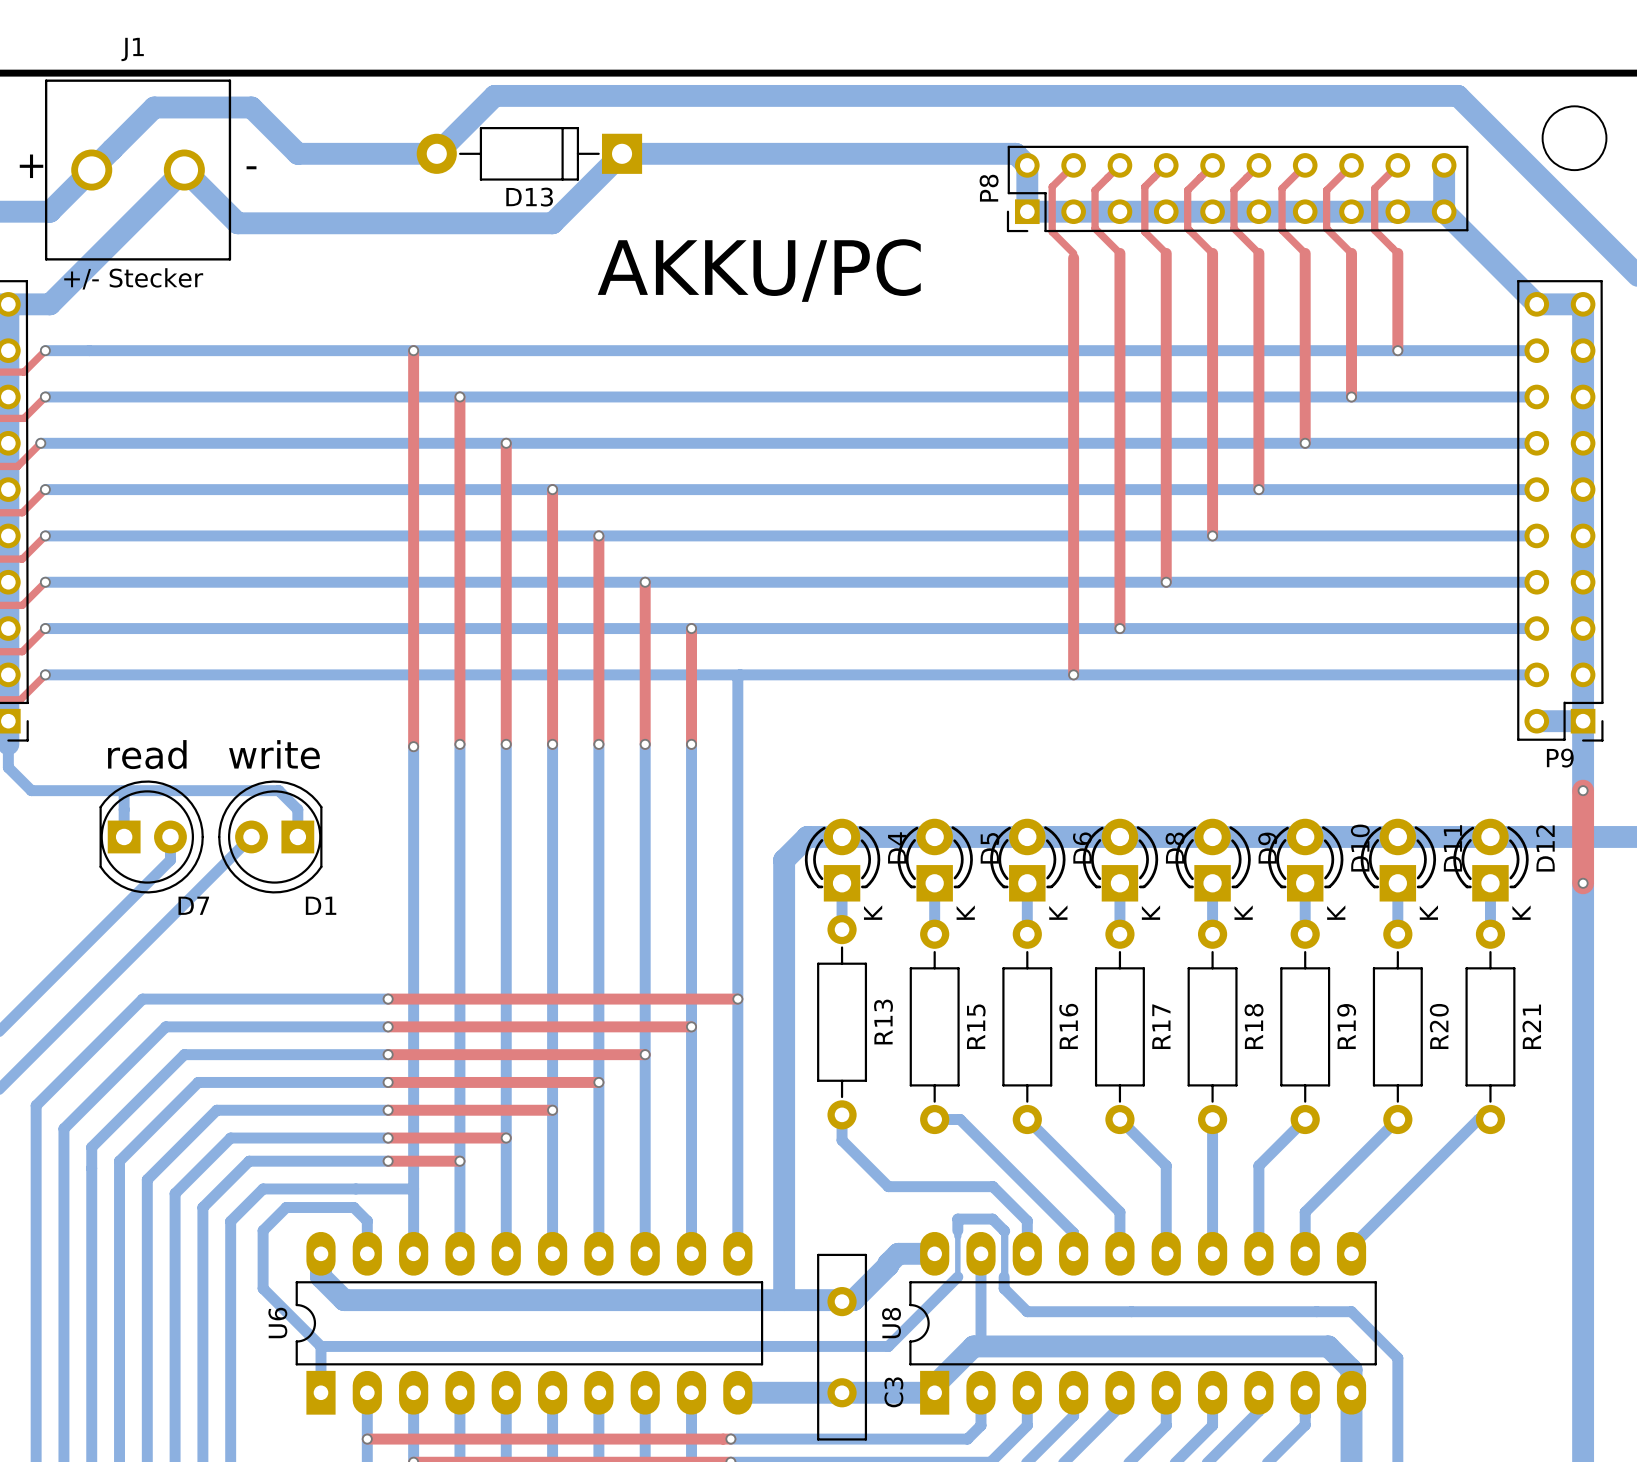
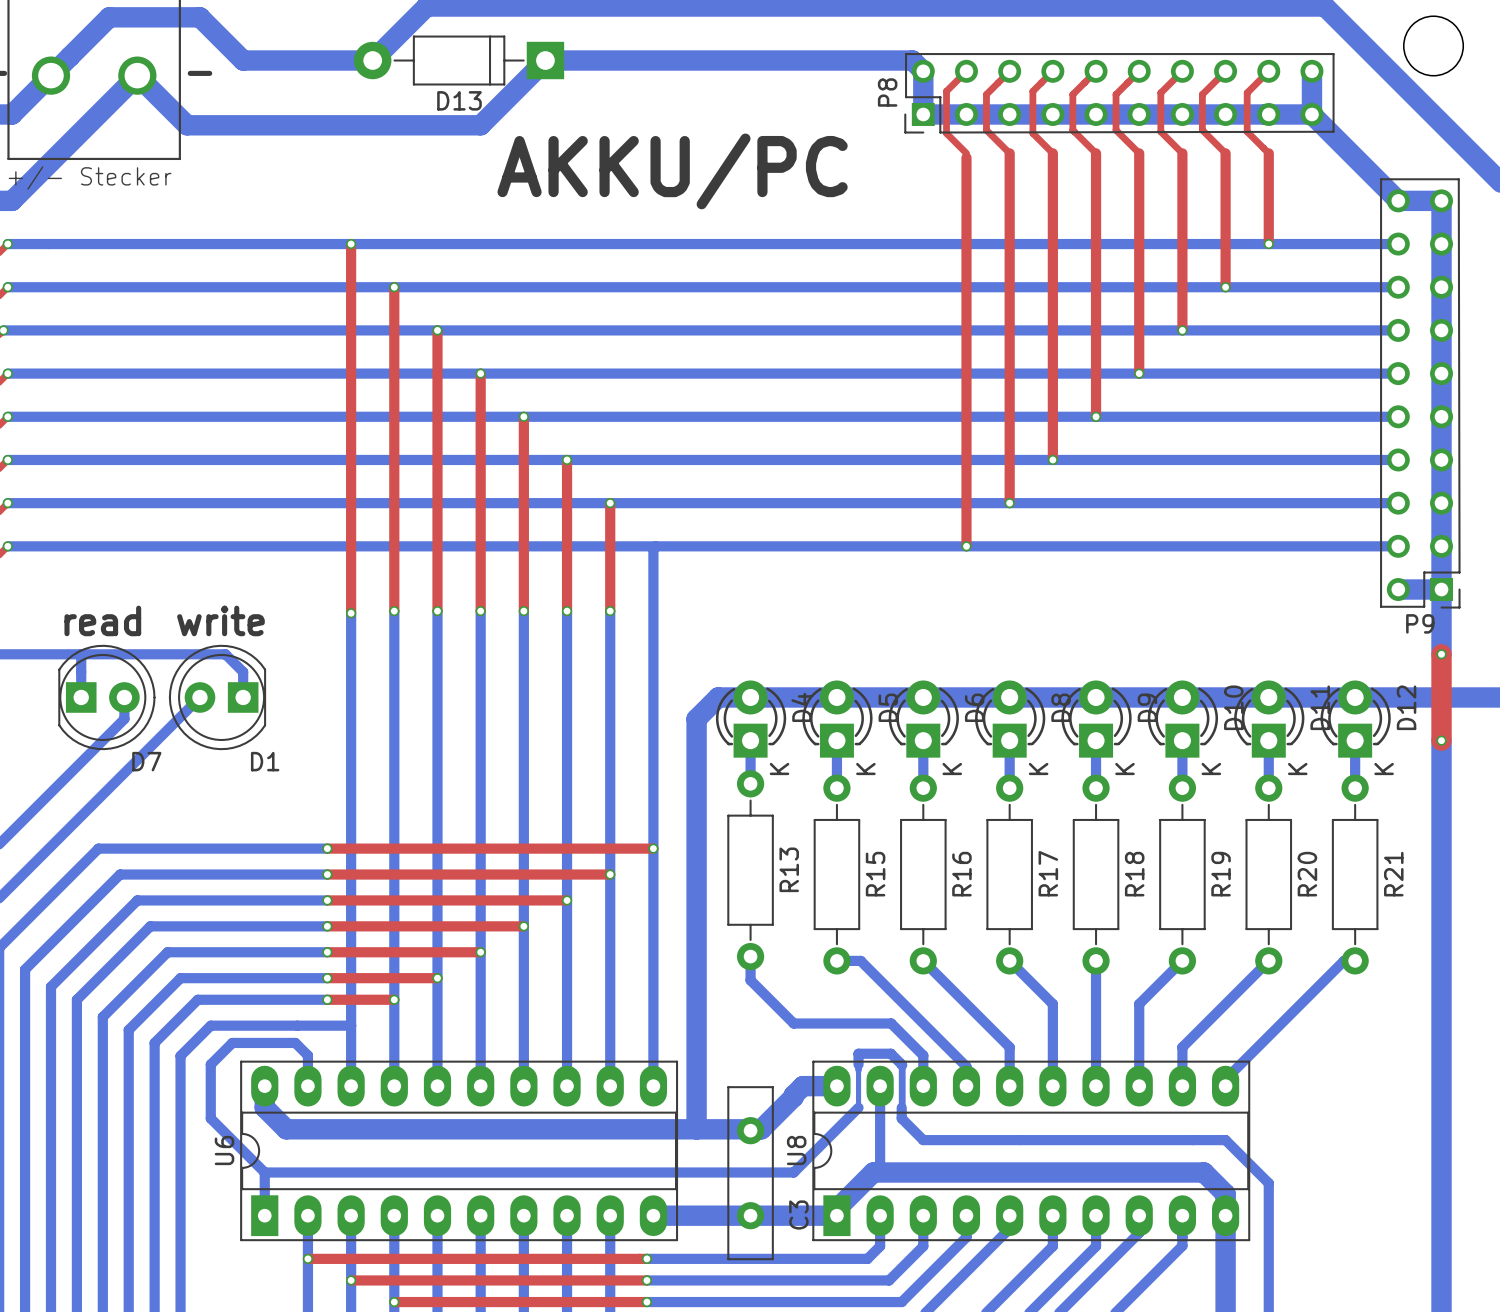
U6 footprint: [295, 1231, 764, 1415] -> [240, 1060, 679, 1242]
U8 footprint: [909, 1231, 1377, 1415] -> [812, 1060, 1251, 1242]

